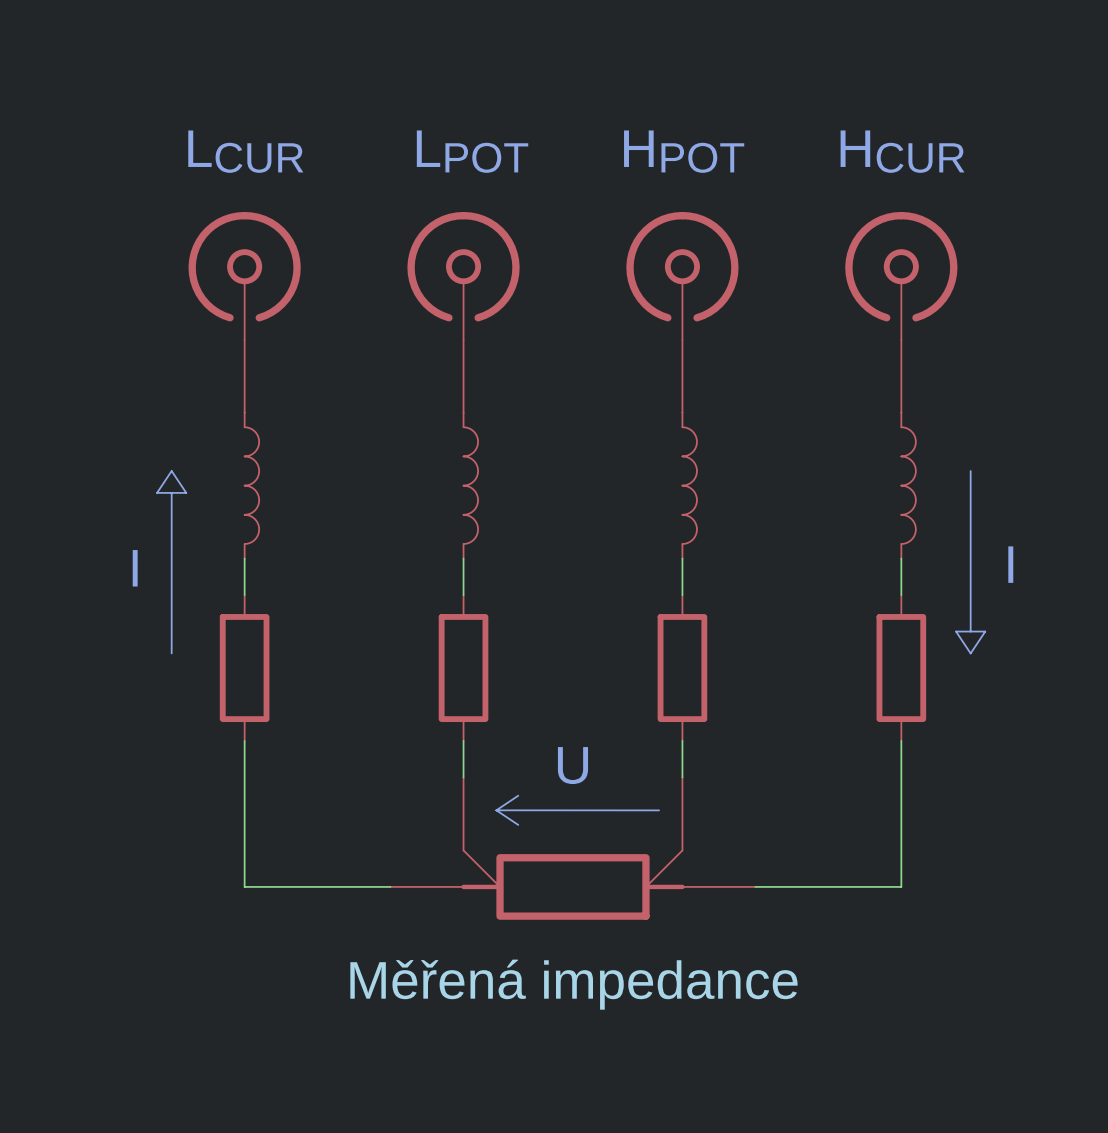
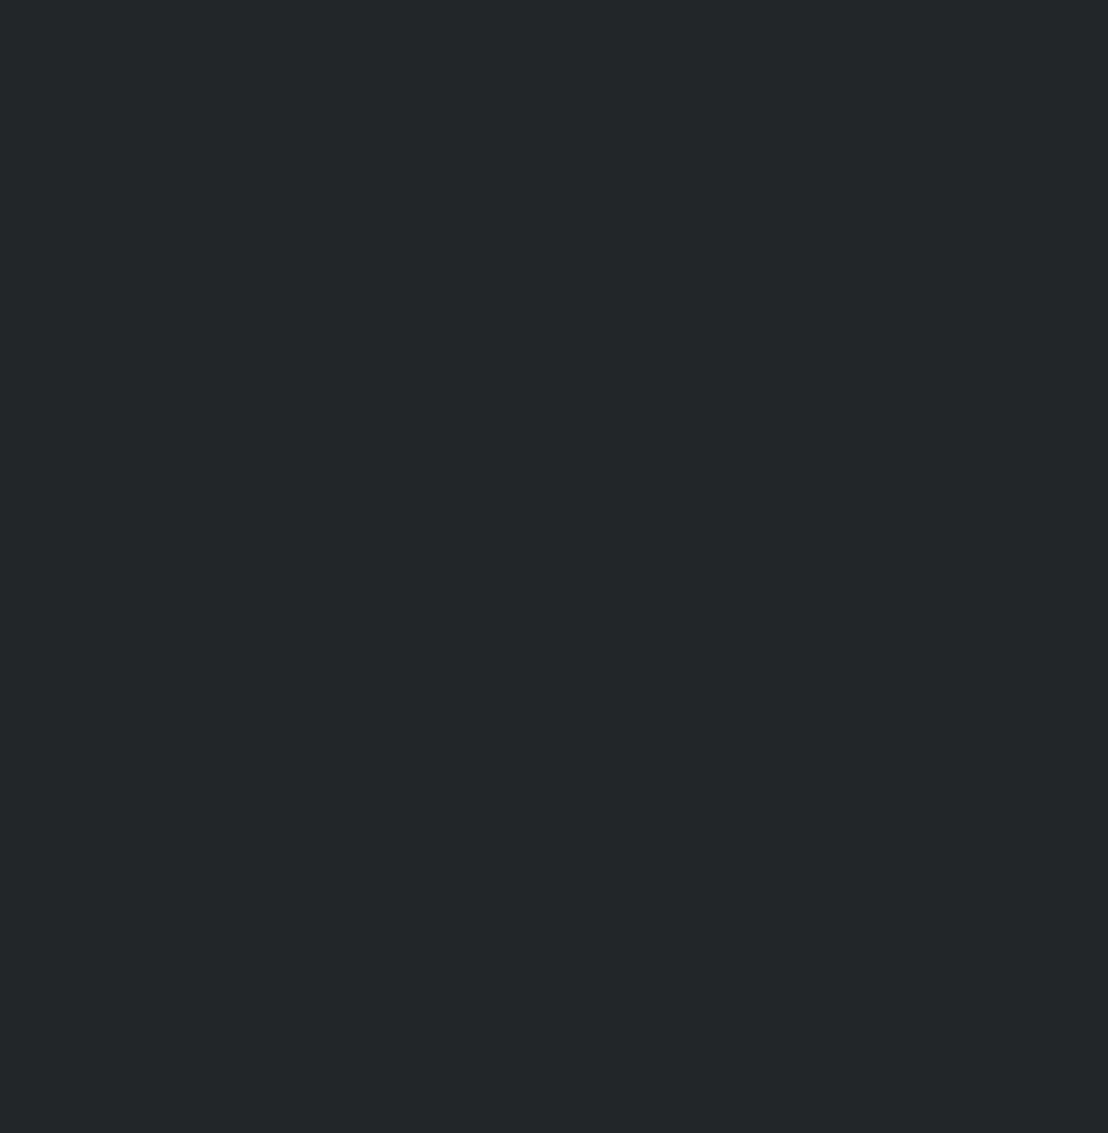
text: LCUR (245, 151) -> none
text: LPOT (472, 151) -> none
text: HPOT (684, 151) -> none
text: HCUR (902, 151) -> none
part: (244, 312) -> none
part: (463, 312) -> none
part: (682, 312) -> none
part: (901, 312) -> none
line: (171, 471) (157, 492) (186, 492) (171, 471) -> none
line: (970, 471) (970, 631) -> none
part: (251, 485) -> none
part: (470, 485) -> none
part: (689, 485) -> none
part: (908, 485) -> none
line: (171, 492) (171, 653) -> none
wire: (244, 558) (244, 595) -> none
wire: (463, 558) (463, 595) -> none
wire: (682, 558) (682, 595) -> none
wire: (901, 558) (901, 595) -> none
text: I (1010, 564) -> none
text: I (135, 568) -> none
line: (956, 631) (985, 631) (970, 653) (956, 631) -> none
part: (244, 668) -> none
part: (463, 668) -> none
part: (682, 668) -> none
part: (901, 668) -> none
wire: (244, 741) (244, 886) (390, 886) -> none
wire: (463, 741) (463, 777) -> none
wire: (682, 741) (682, 777) -> none
wire: (901, 741) (901, 886) (755, 886) -> none
text: U (572, 765) -> none
line: (518, 795) (496, 810) -> none
line: (496, 810) (518, 824) -> none
line: (496, 810) (659, 810) -> none
part: Měřená impedance (572, 848) -> none

